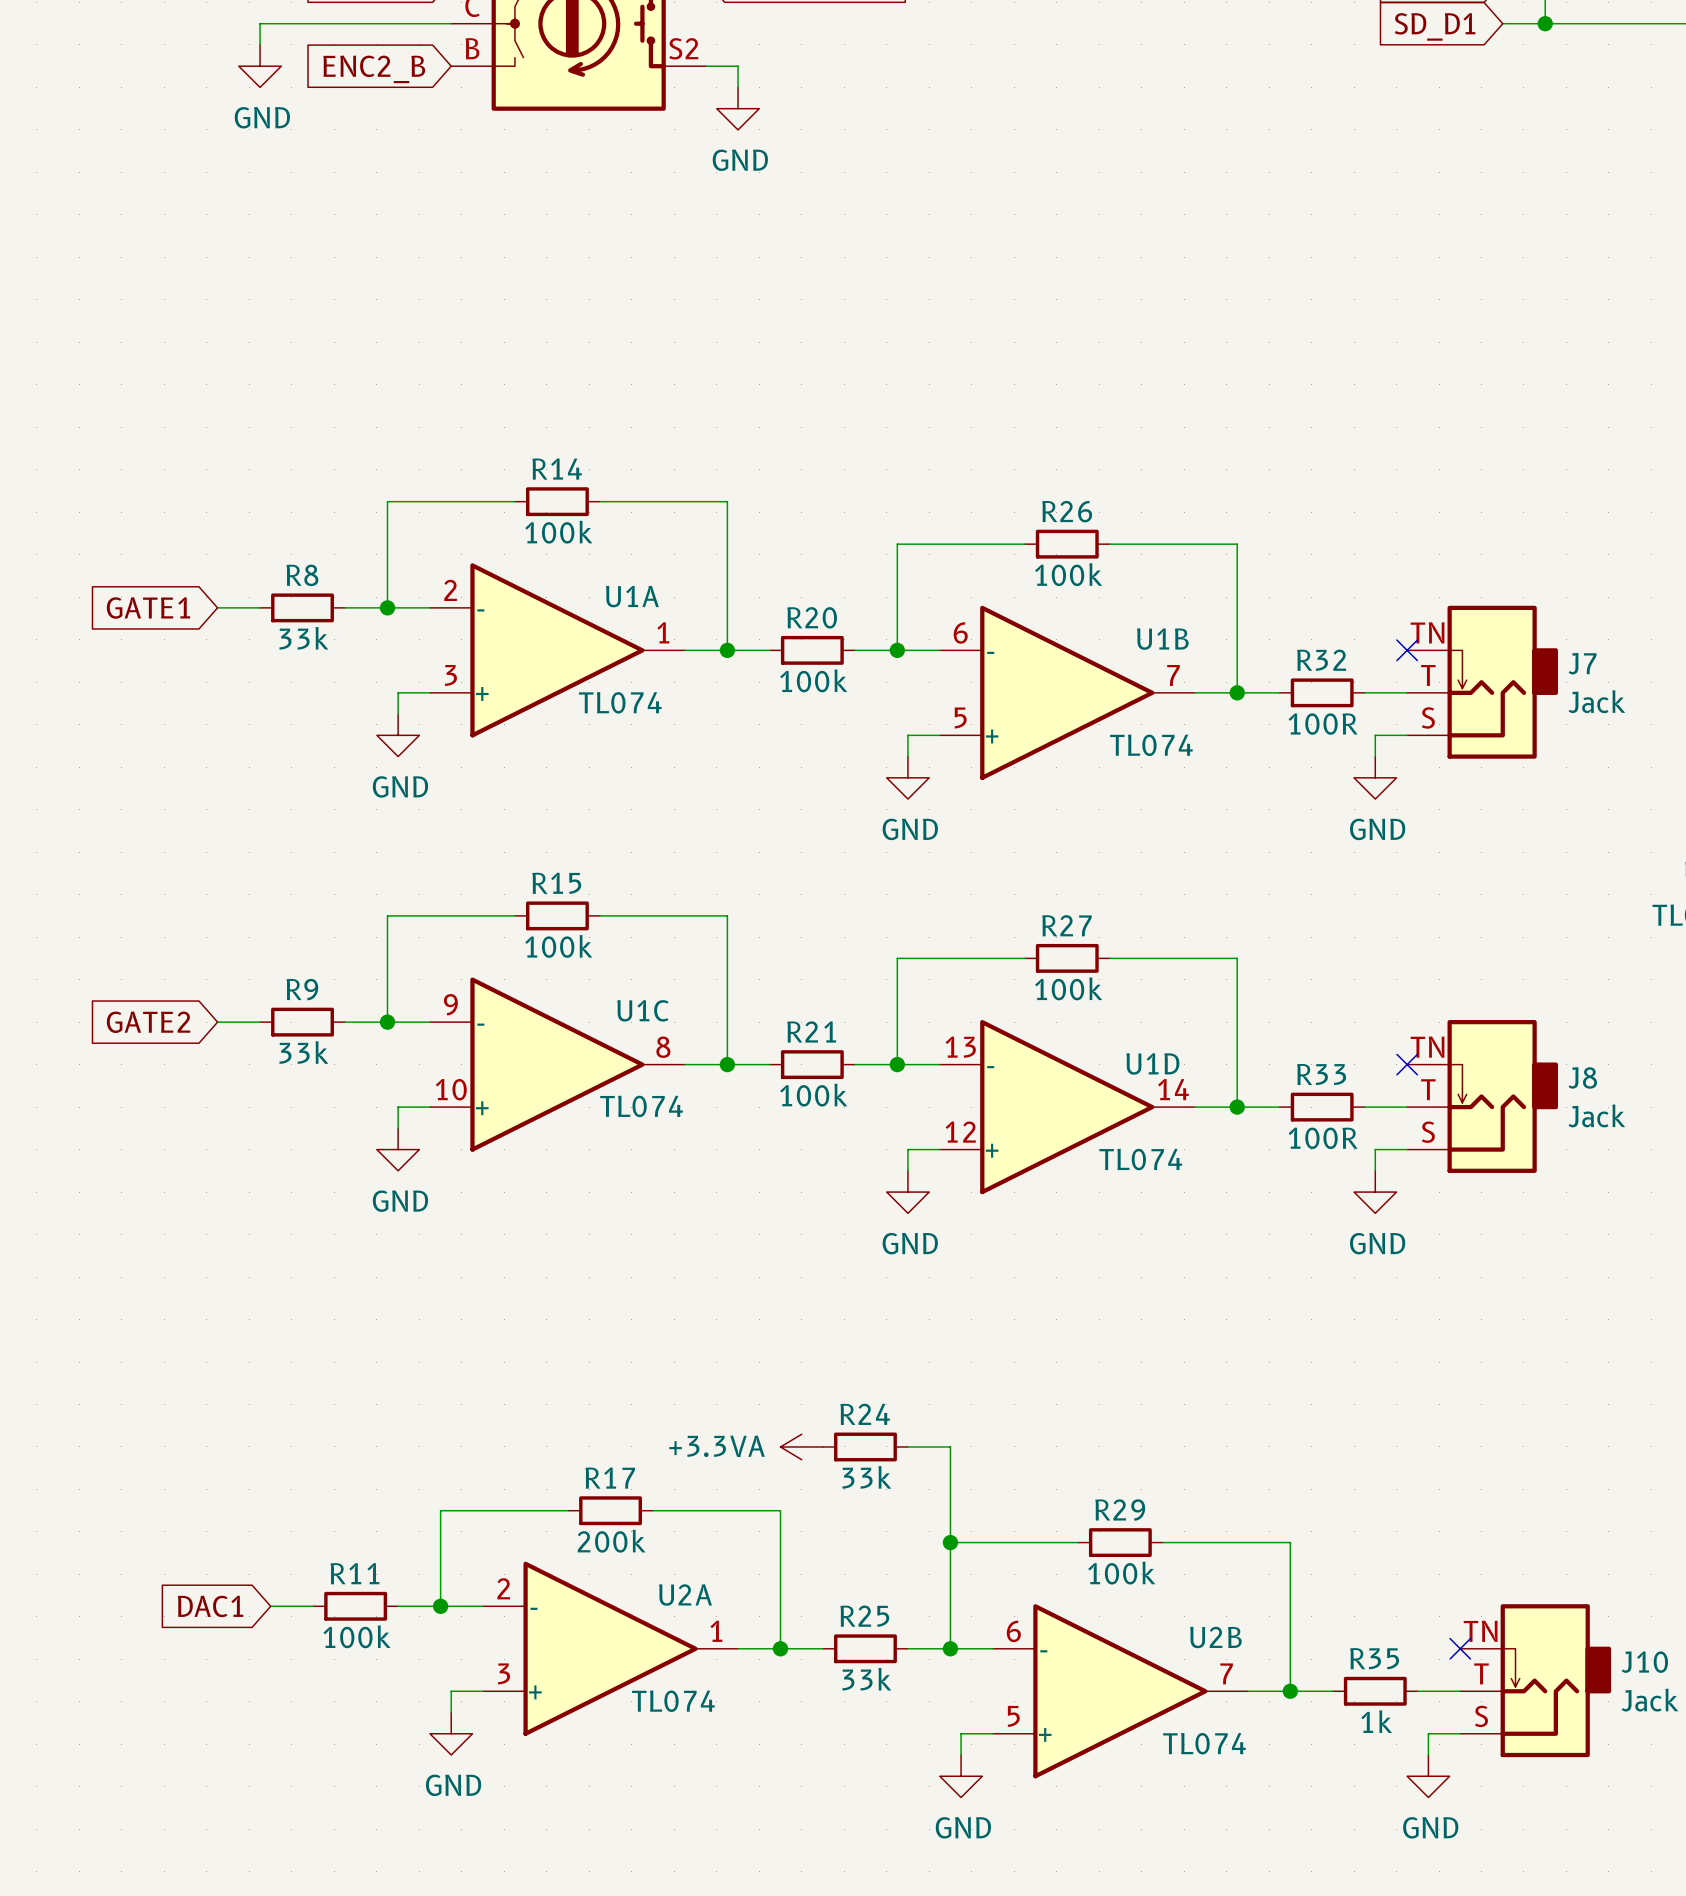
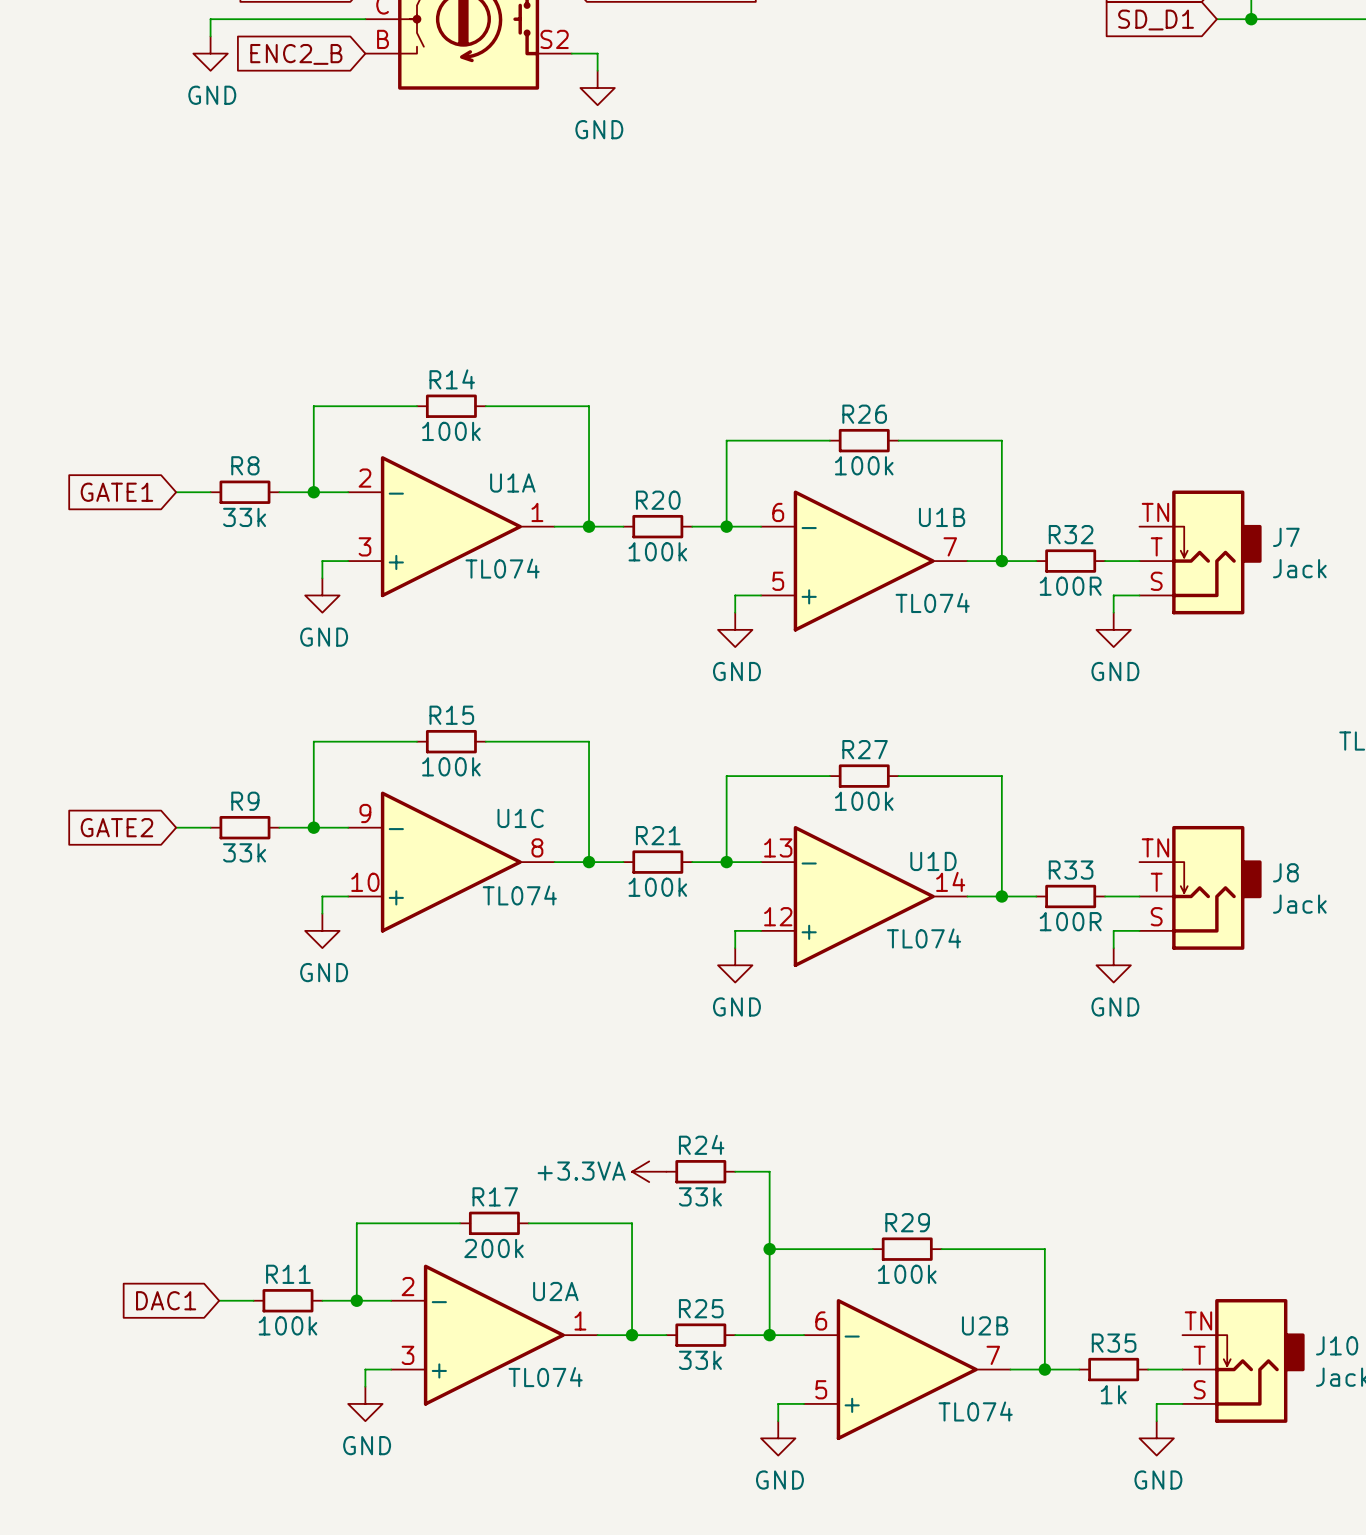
no-connect mark: (1407, 650) -> none
no-connect mark: (1407, 1064) -> none
no-connect mark: (1460, 1648) -> none

